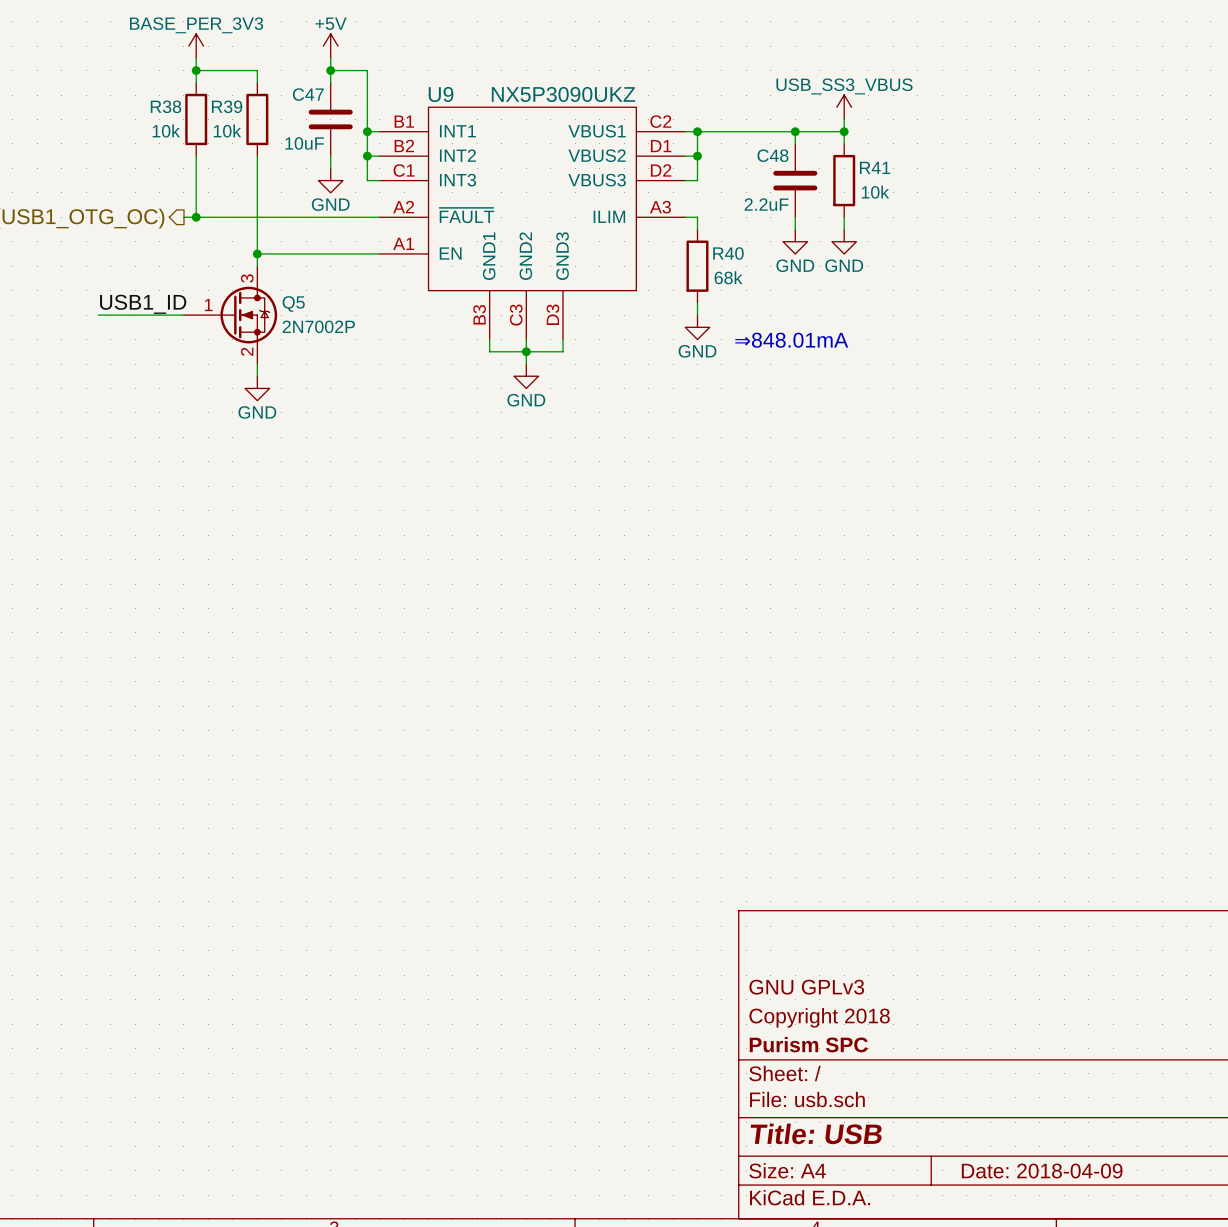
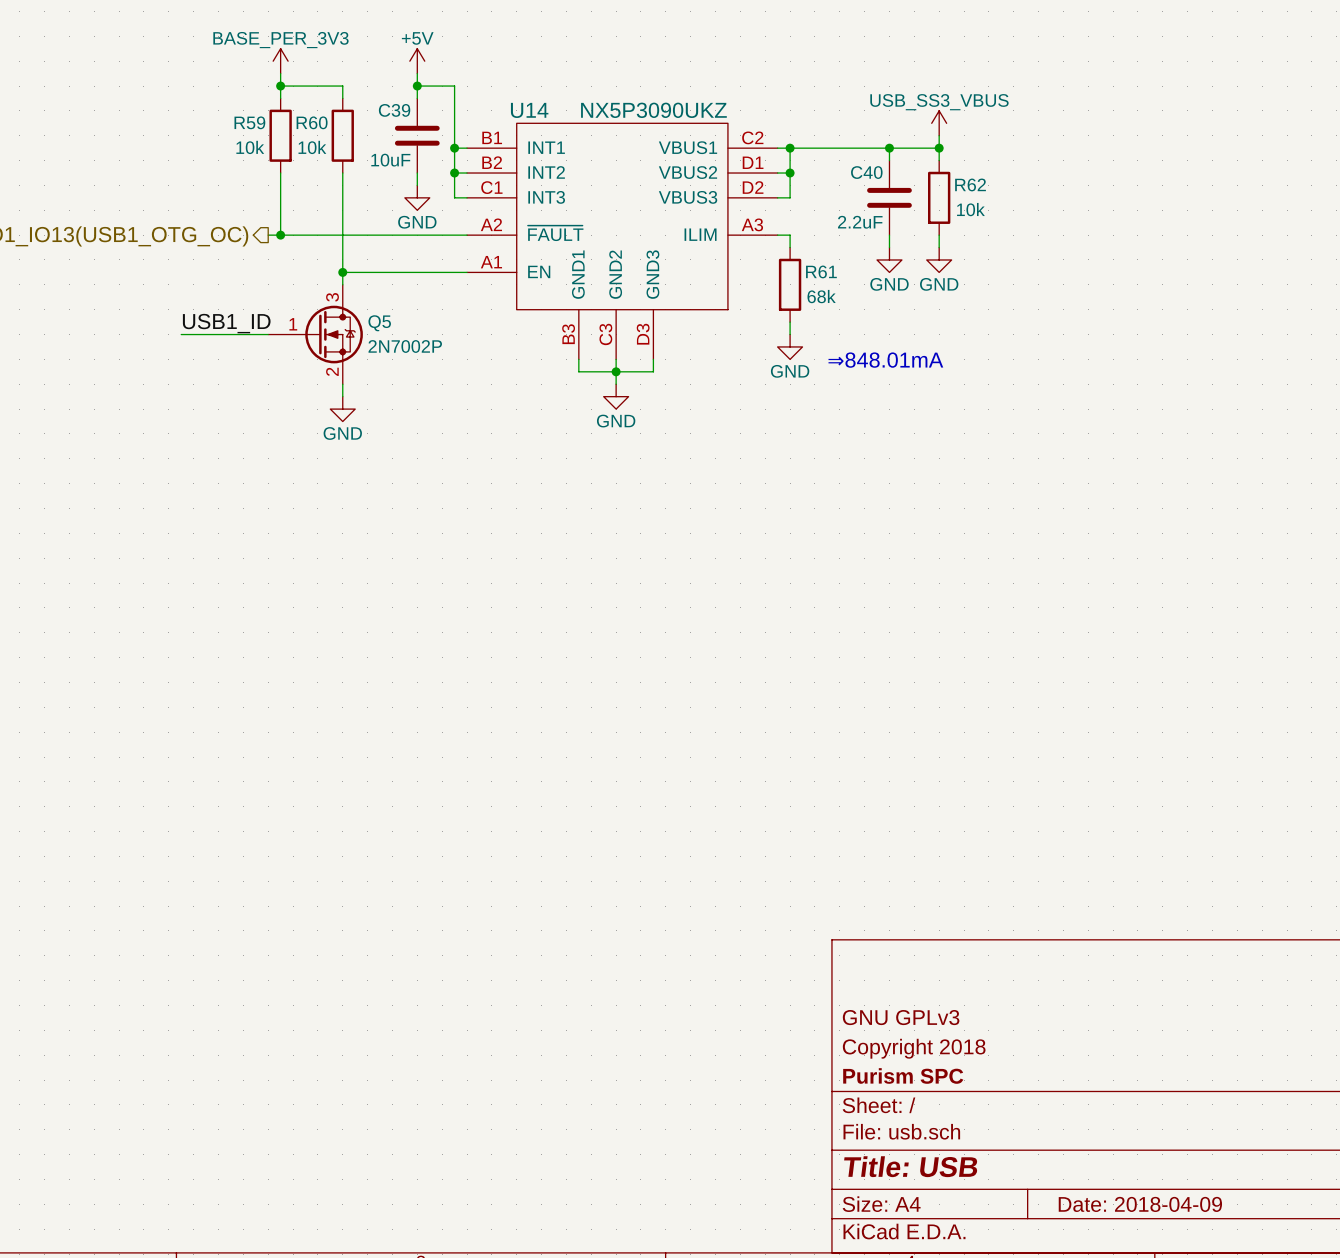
C47 name: C47 (308, 94) -> C39 (394, 110)
U9 name: U9 (441, 94) -> U14 (529, 110)
R38 name: R38 (165, 106) -> R59 (249, 122)
R39 name: R39 (227, 106) -> R60 (312, 122)
C48 name: C48 (772, 155) -> C40 (866, 172)
R41 name: R41 (875, 167) -> R62 (970, 184)
R40 name: R40 (728, 253) -> R61 (821, 271)

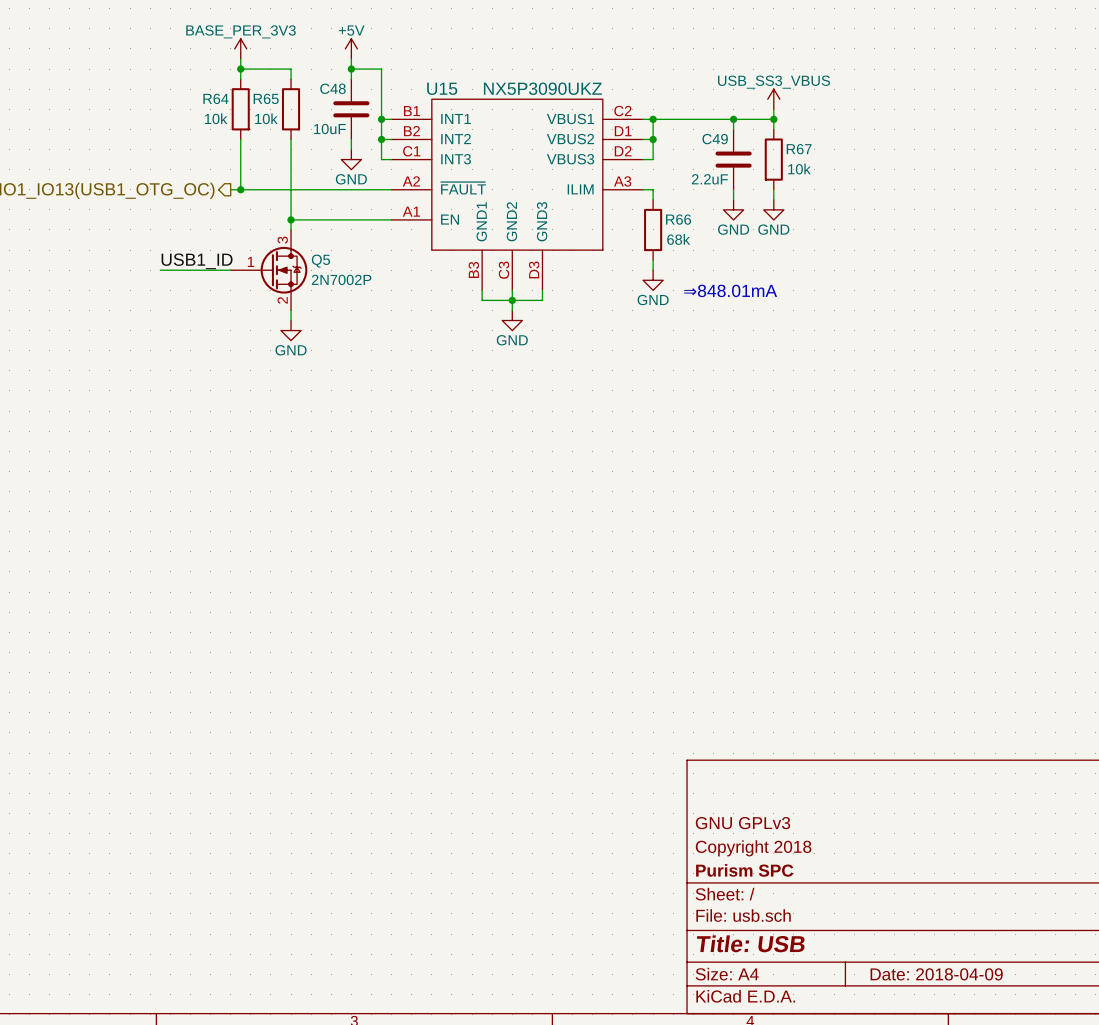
C39 name: C39 (394, 110) -> C48 (332, 88)
U14 name: U14 (529, 110) -> U15 (442, 88)
R59 name: R59 (249, 122) -> R64 (215, 98)
R60 name: R60 (312, 122) -> R65 (266, 98)
C40 name: C40 (866, 172) -> C49 (715, 139)
R62 name: R62 (970, 184) -> R67 (799, 149)
R61 name: R61 (821, 271) -> R66 (678, 219)

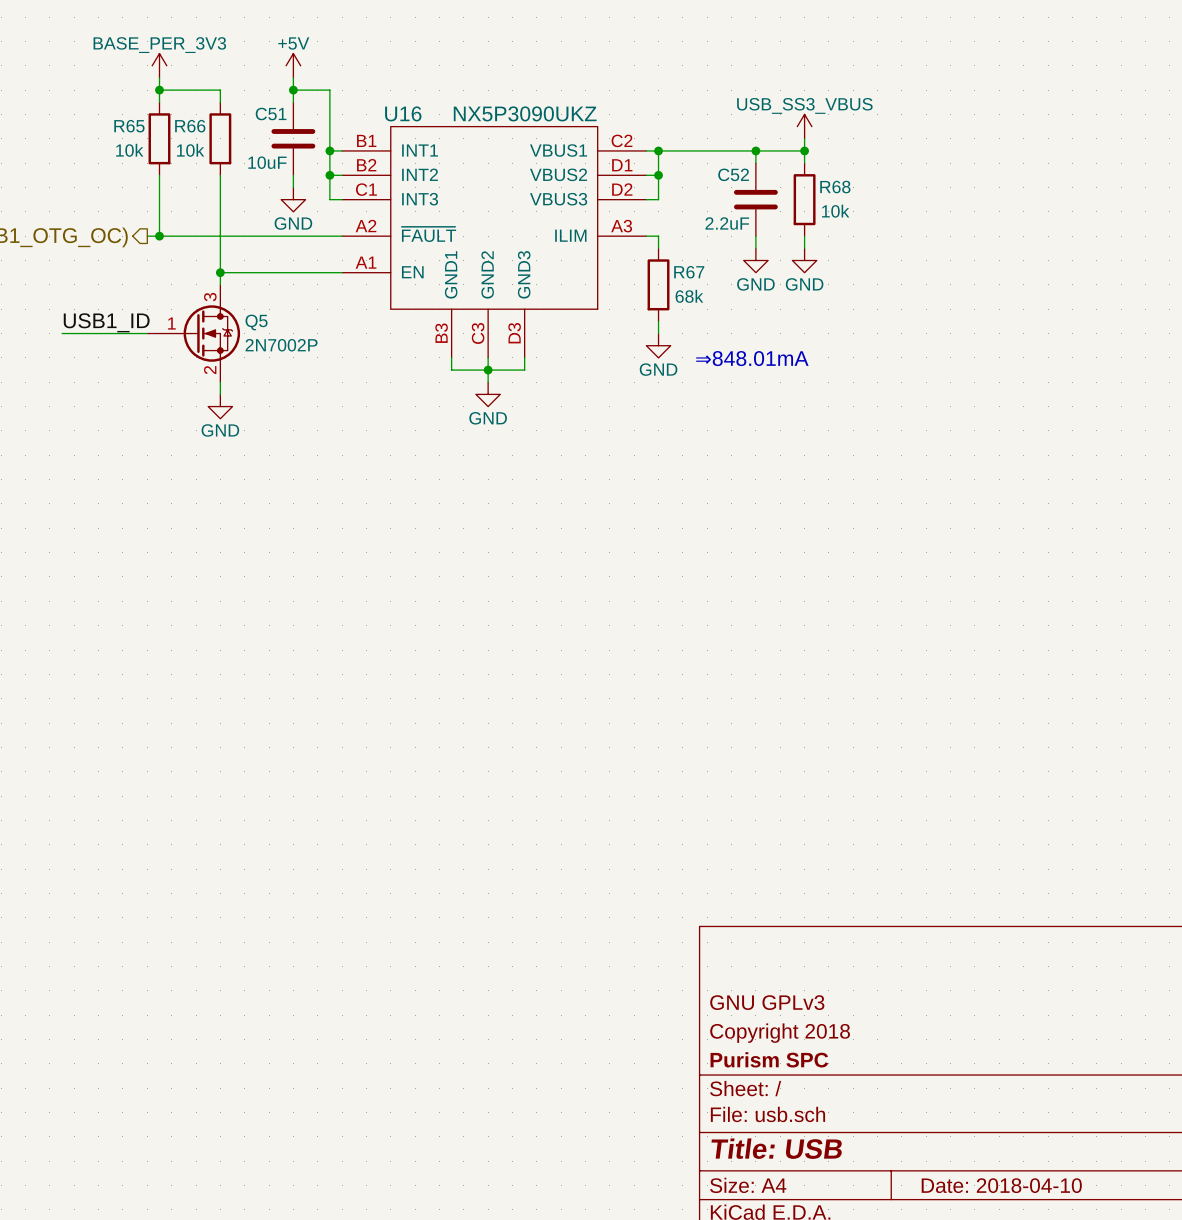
C48 name: C48 (332, 88) -> C51 (271, 113)
U15 name: U15 (442, 88) -> U16 (403, 113)
R64 name: R64 (215, 98) -> R65 (129, 126)
R65 name: R65 (266, 98) -> R66 (190, 126)
C49 name: C49 (715, 139) -> C52 (733, 174)
R67 name: R67 (799, 149) -> R68 (835, 187)
R66 name: R66 (678, 219) -> R67 (689, 272)
title block: Date: 2018-04-09 (936, 974) -> Date: 2018-04-10 (1001, 1185)

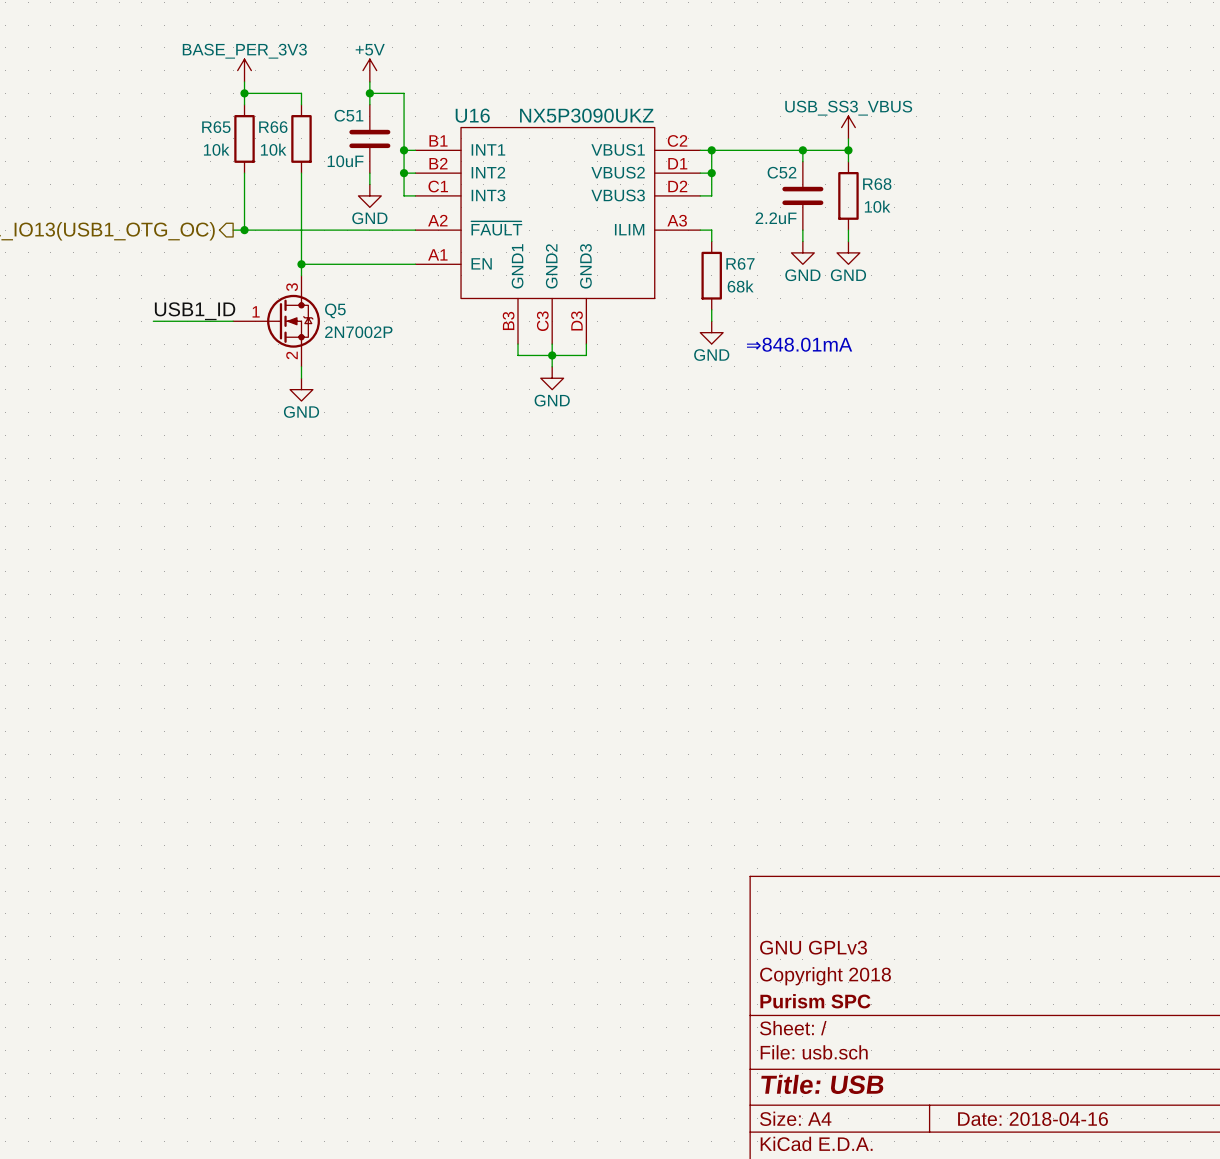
title block: Date: 2018-04-10 (1001, 1185) -> Date: 2018-04-16 (1033, 1119)

